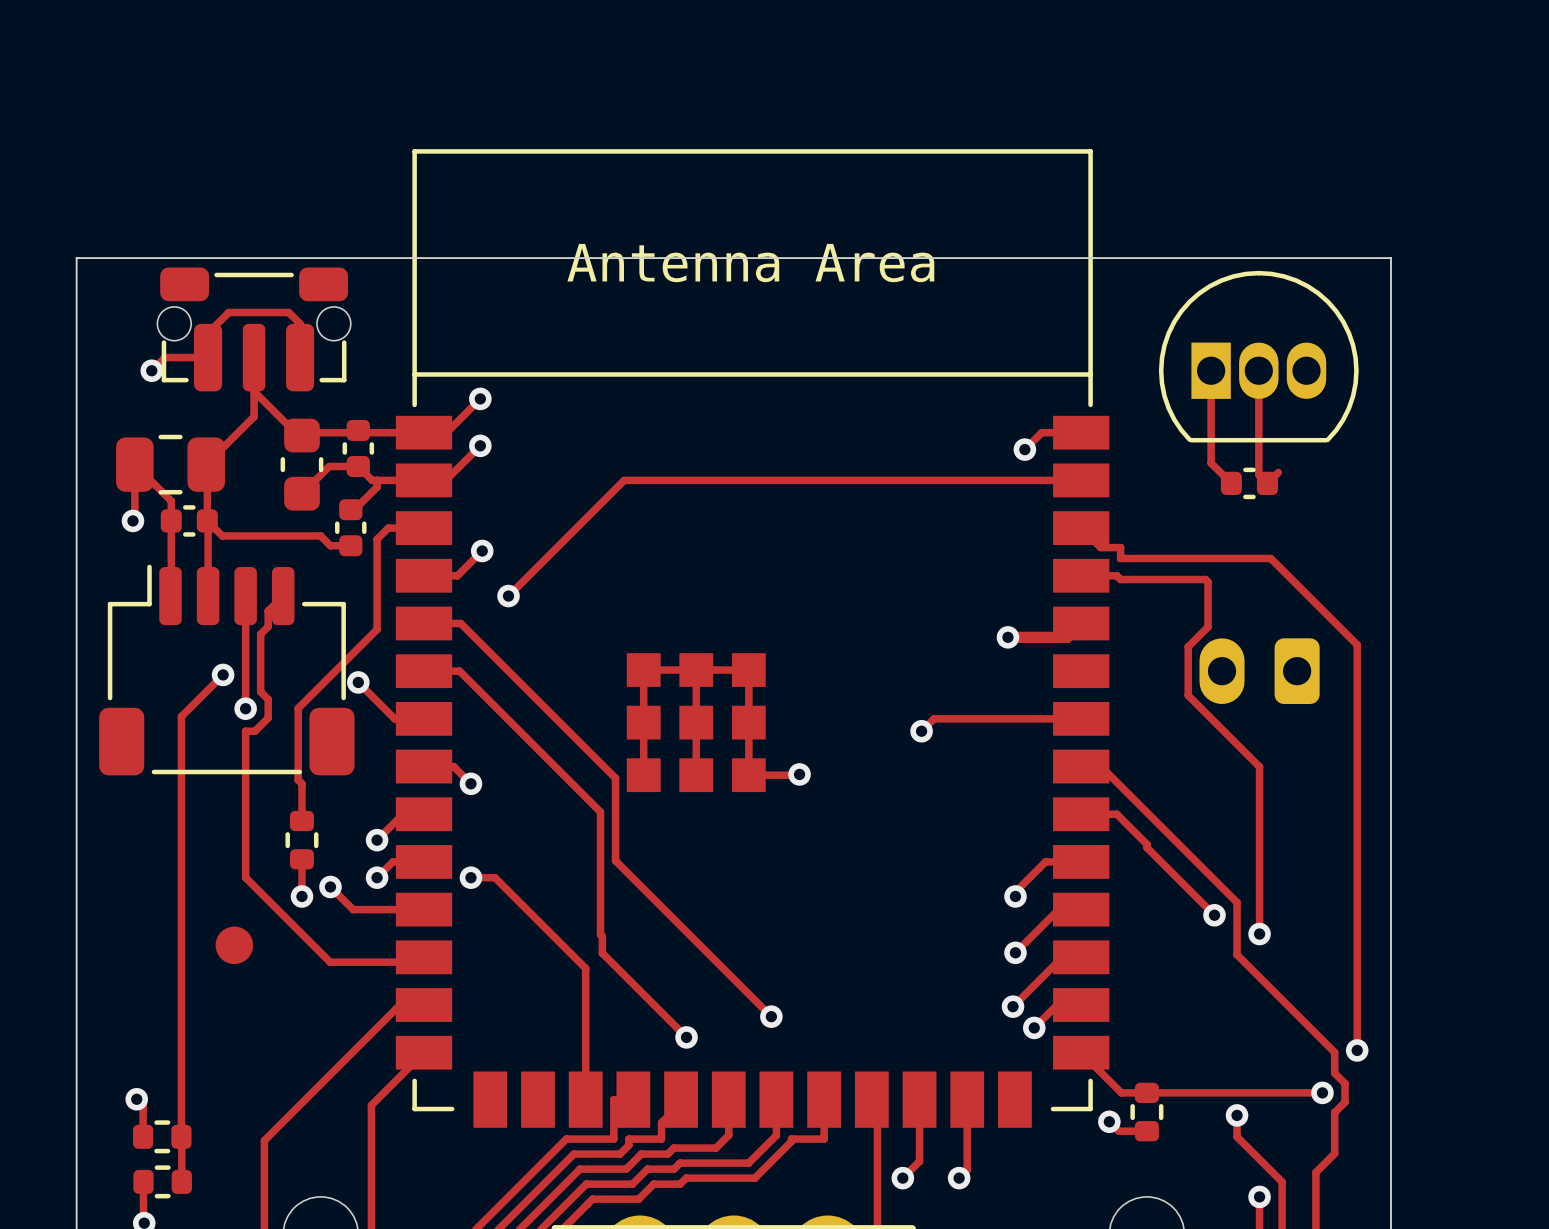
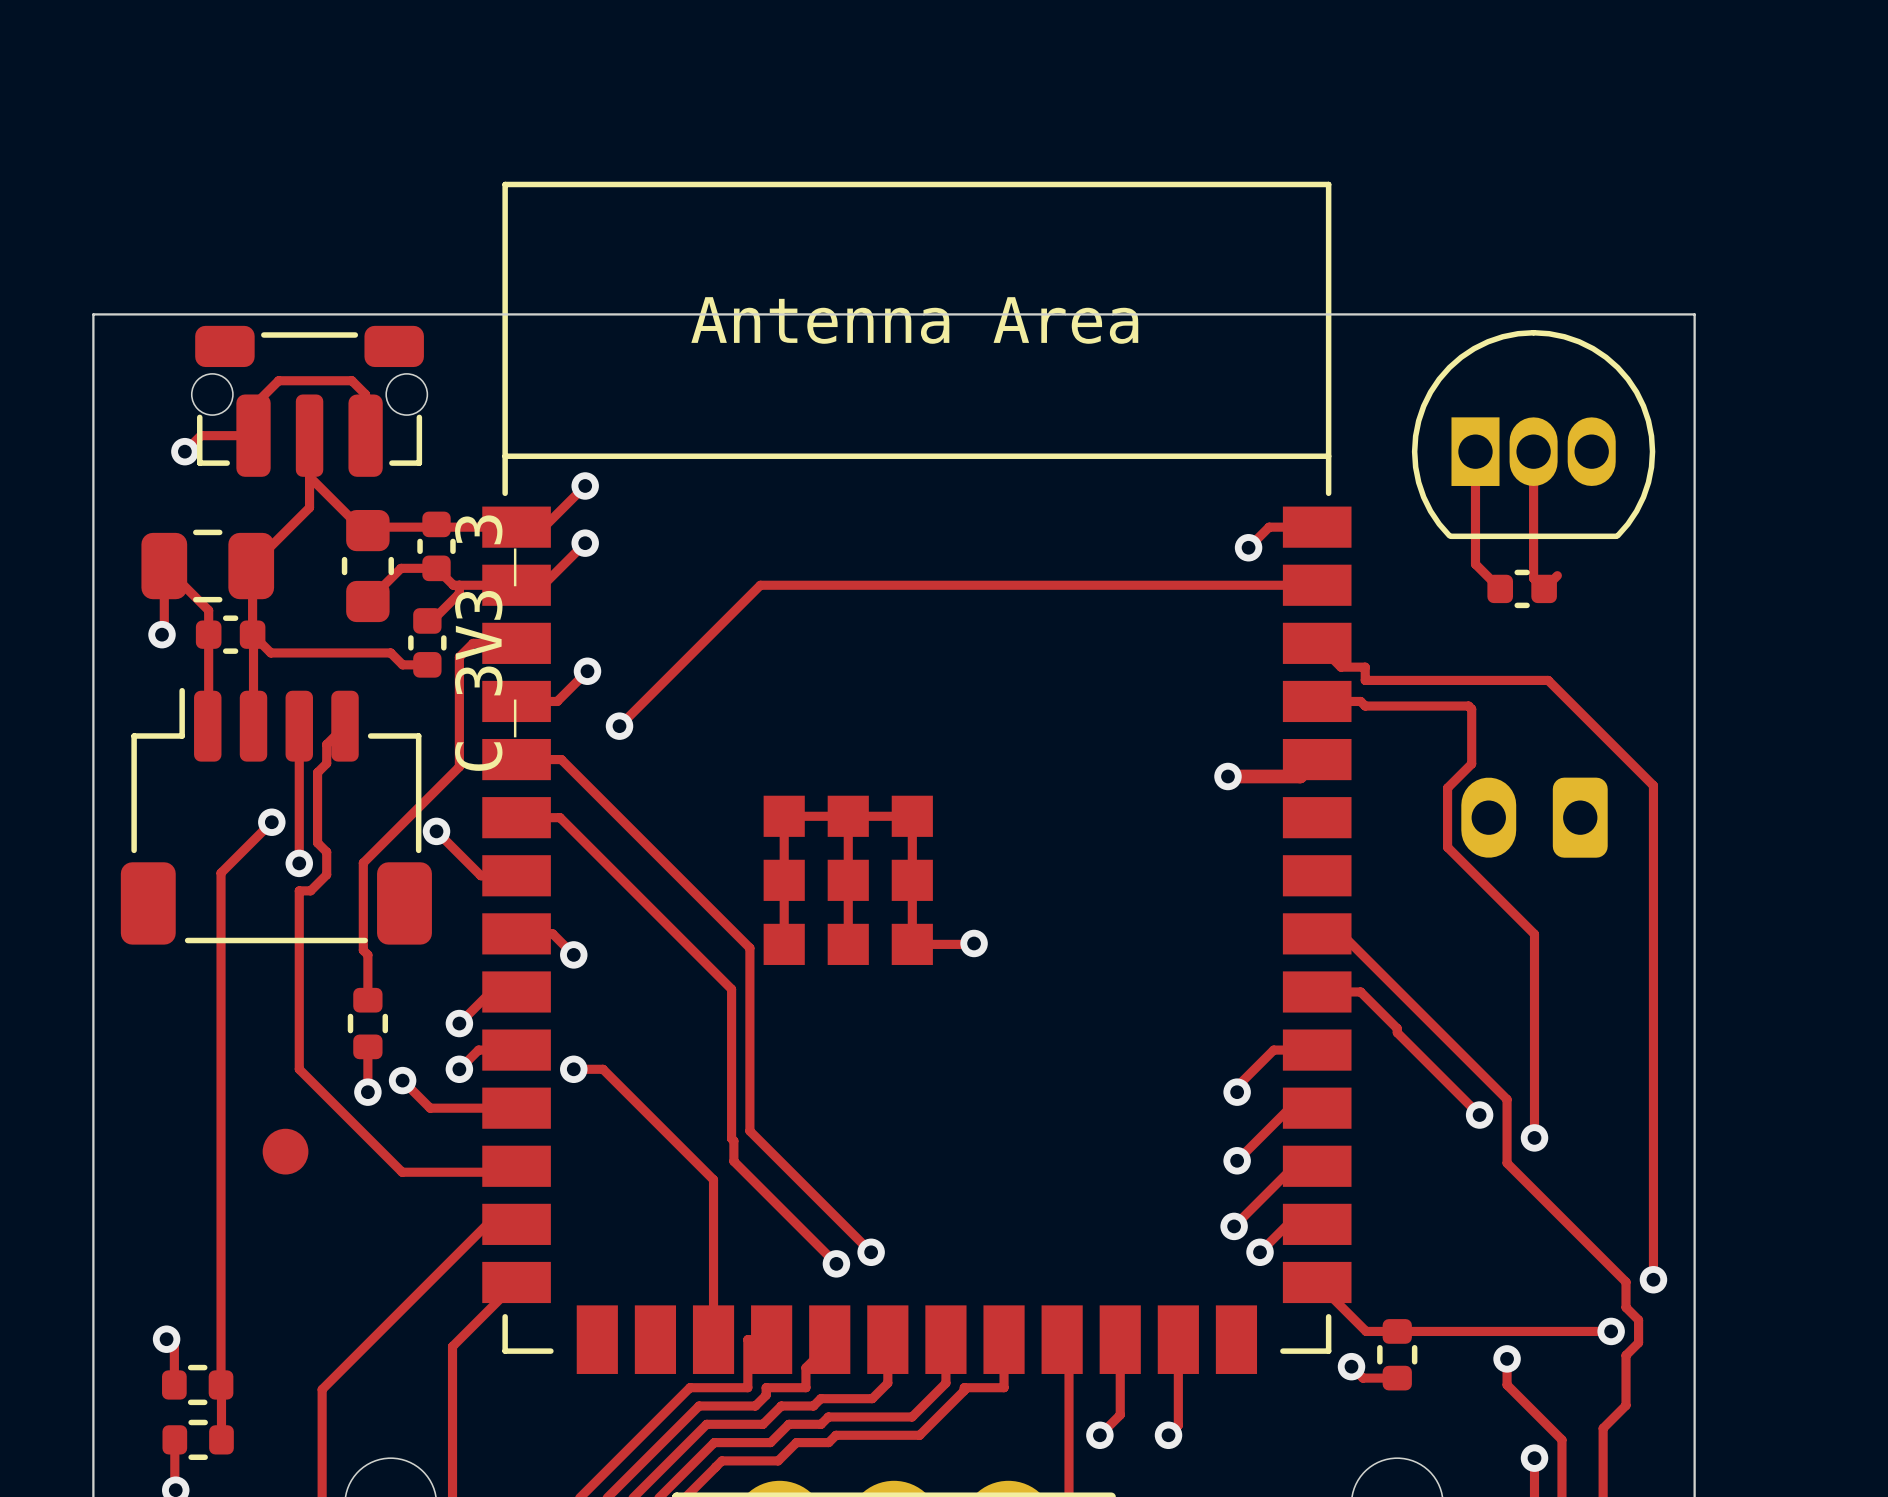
C_3V3_3 name: none -> C_3V3_3 (485, 643)
track: (1081, 718) (933, 718) (921, 731) -> none
via: (921, 731) -> none
track: (615, 860) (771, 1016) -> (749, 1048) (749, 1131) (871, 1252)
via position: (771, 1016) -> (871, 1252)

